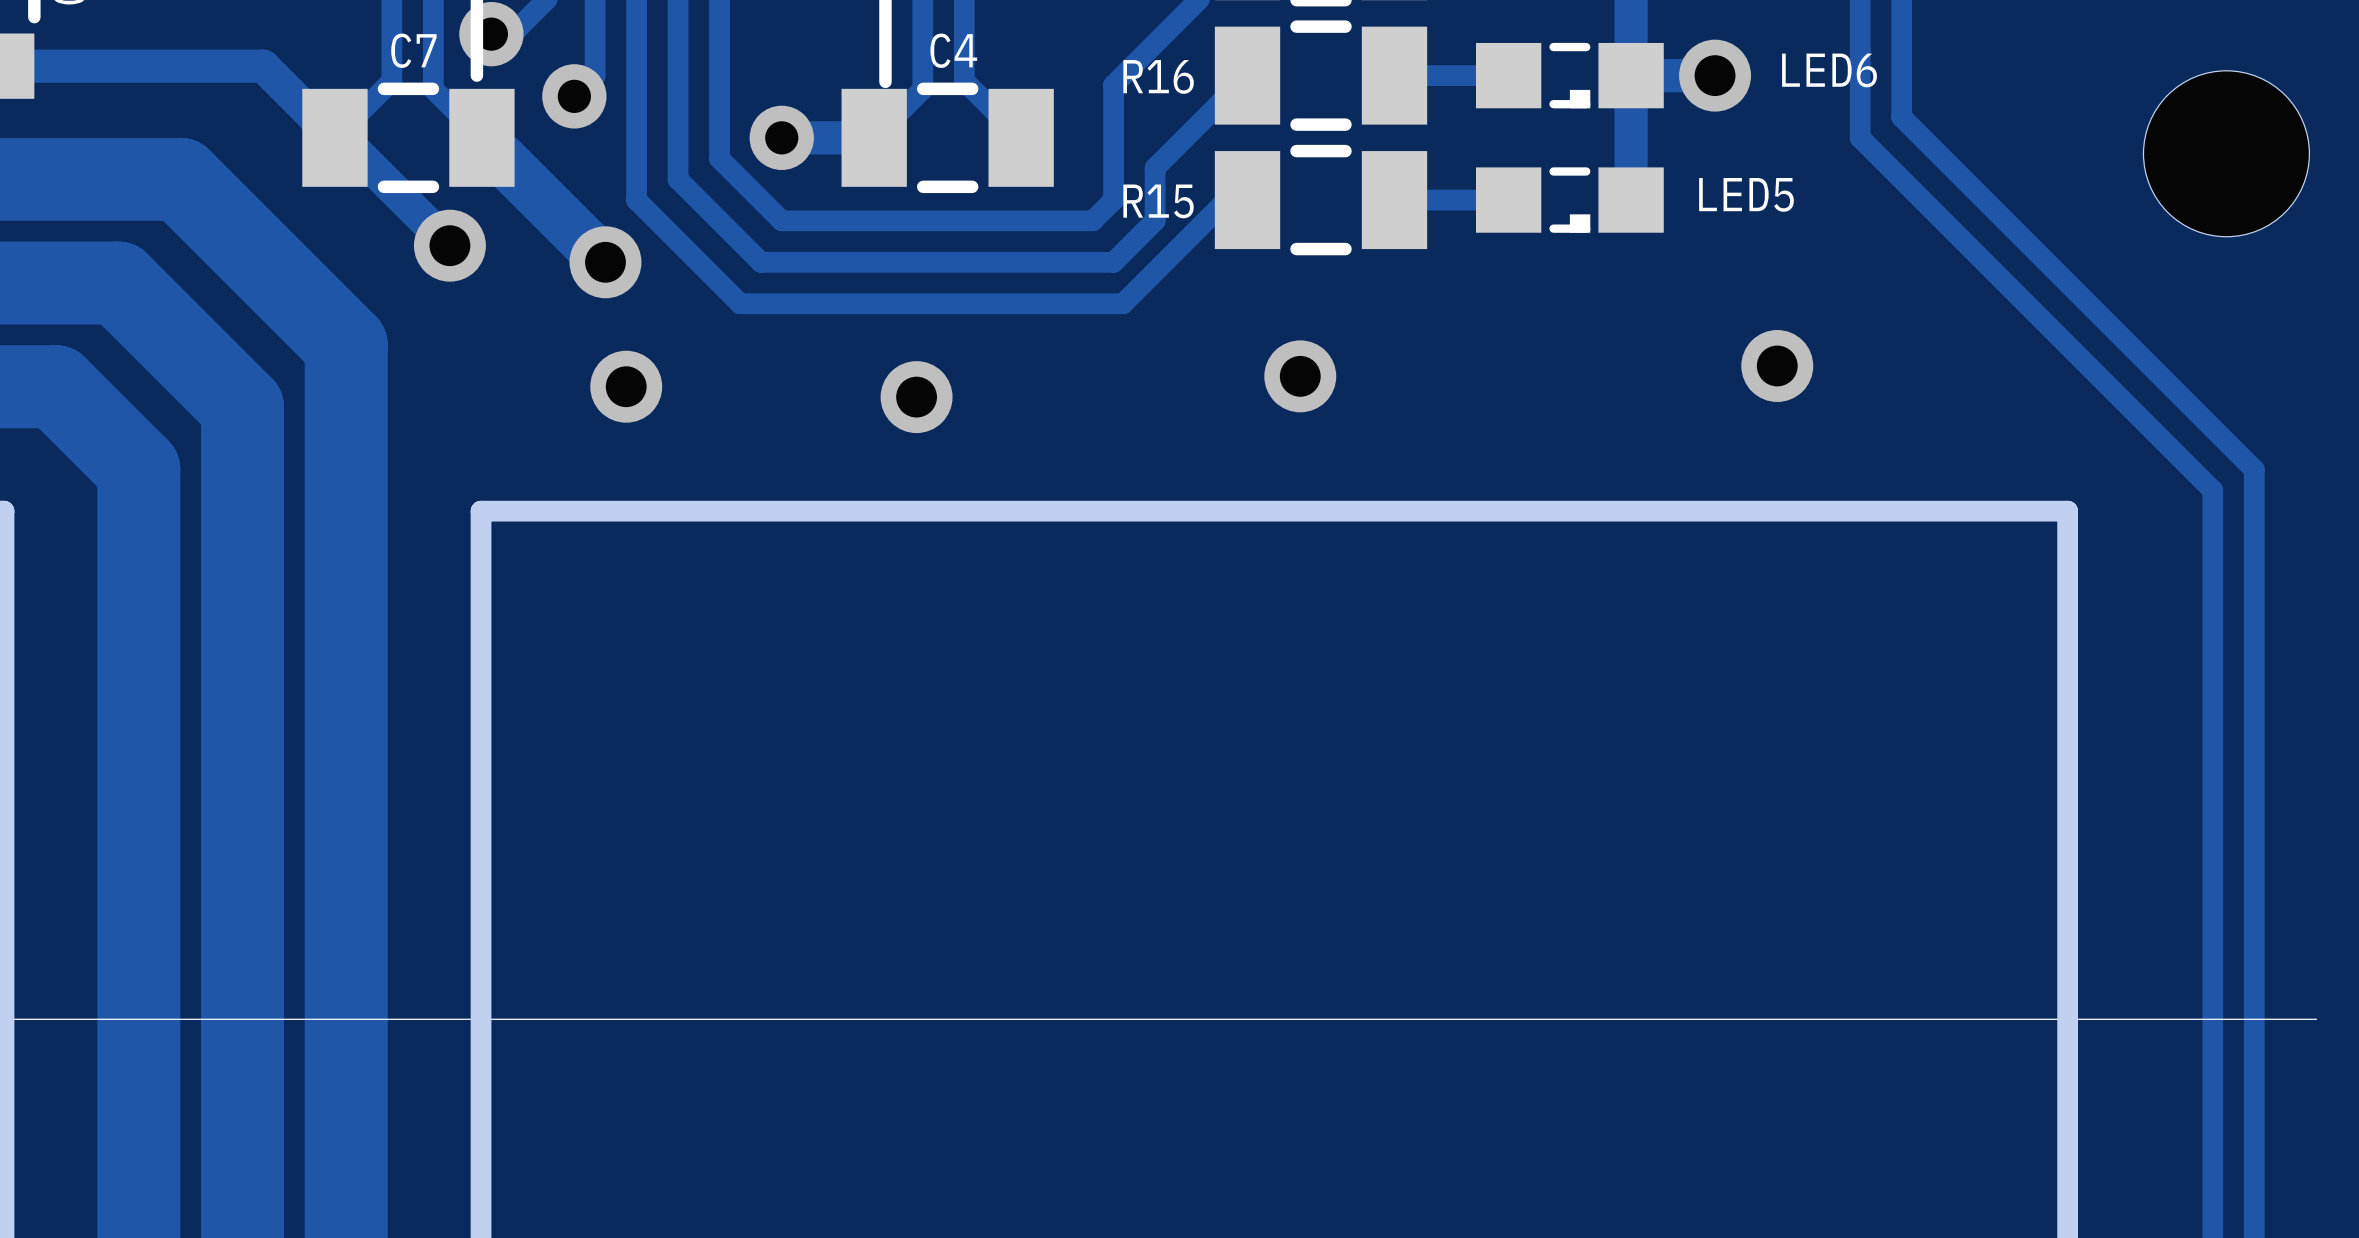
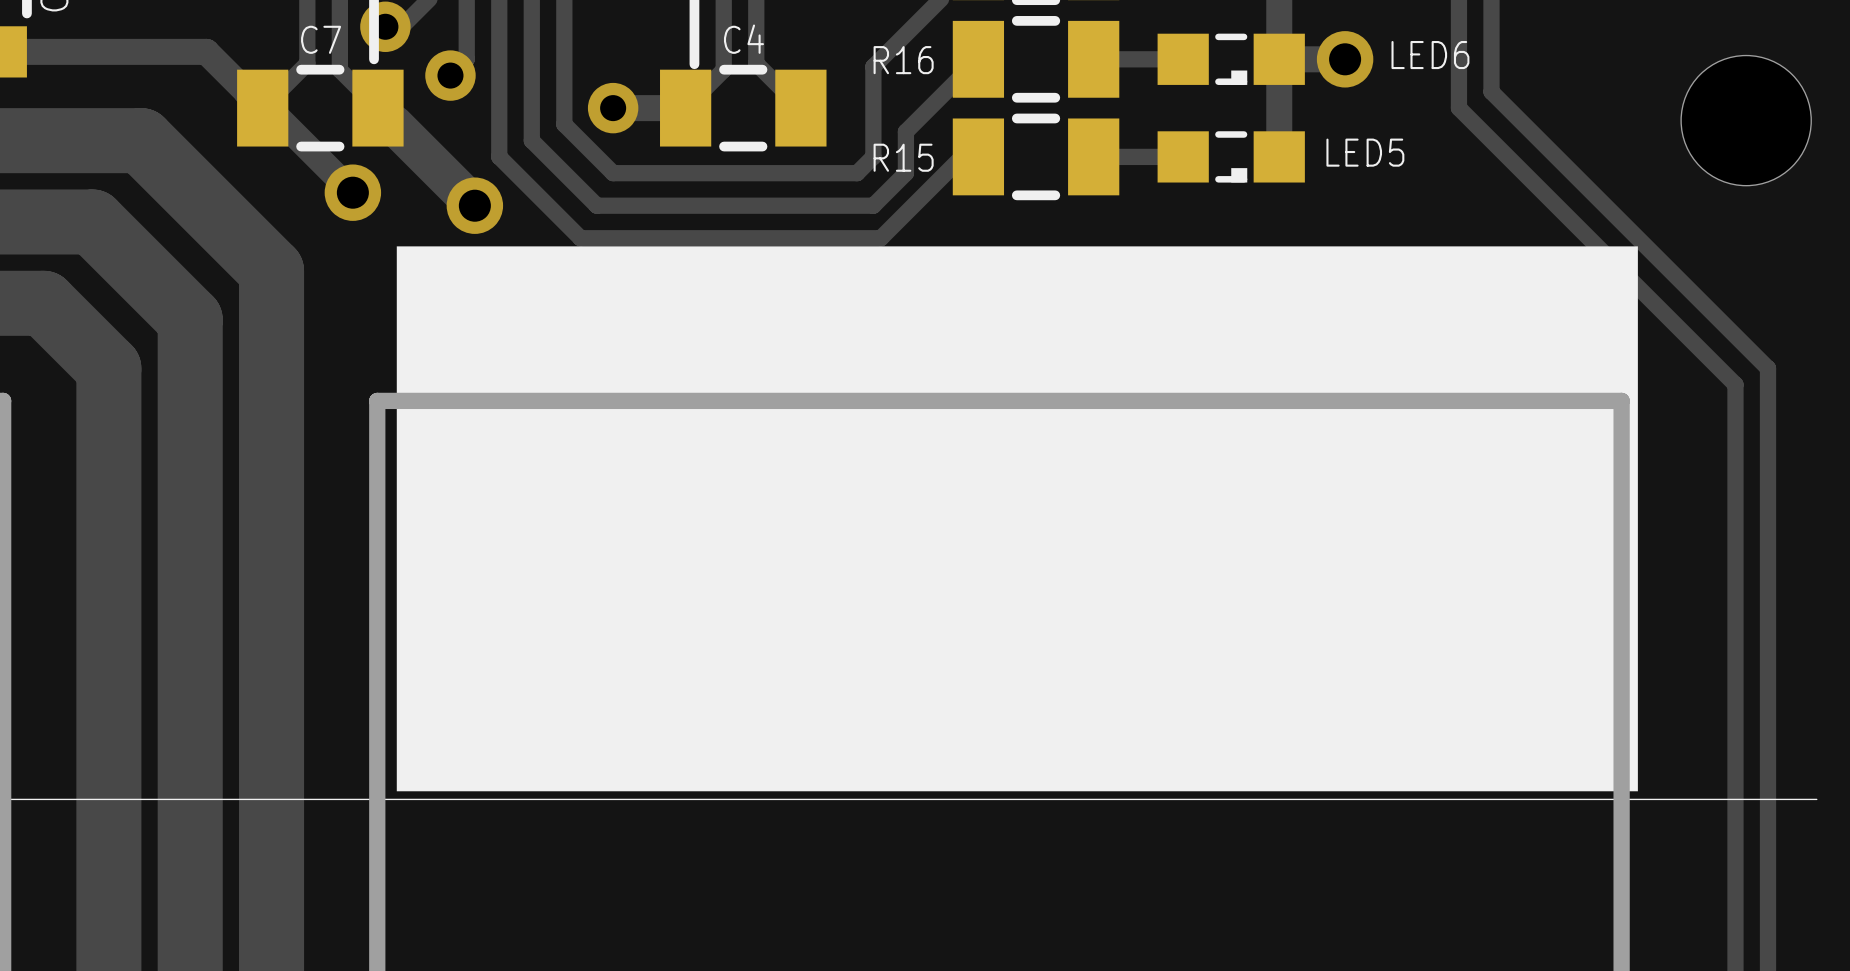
drawing: none -> [396, 246, 1638, 792]
via: (1777, 365) -> none
via: (1300, 376) -> none
via: (626, 386) -> none
via: (916, 397) -> none

